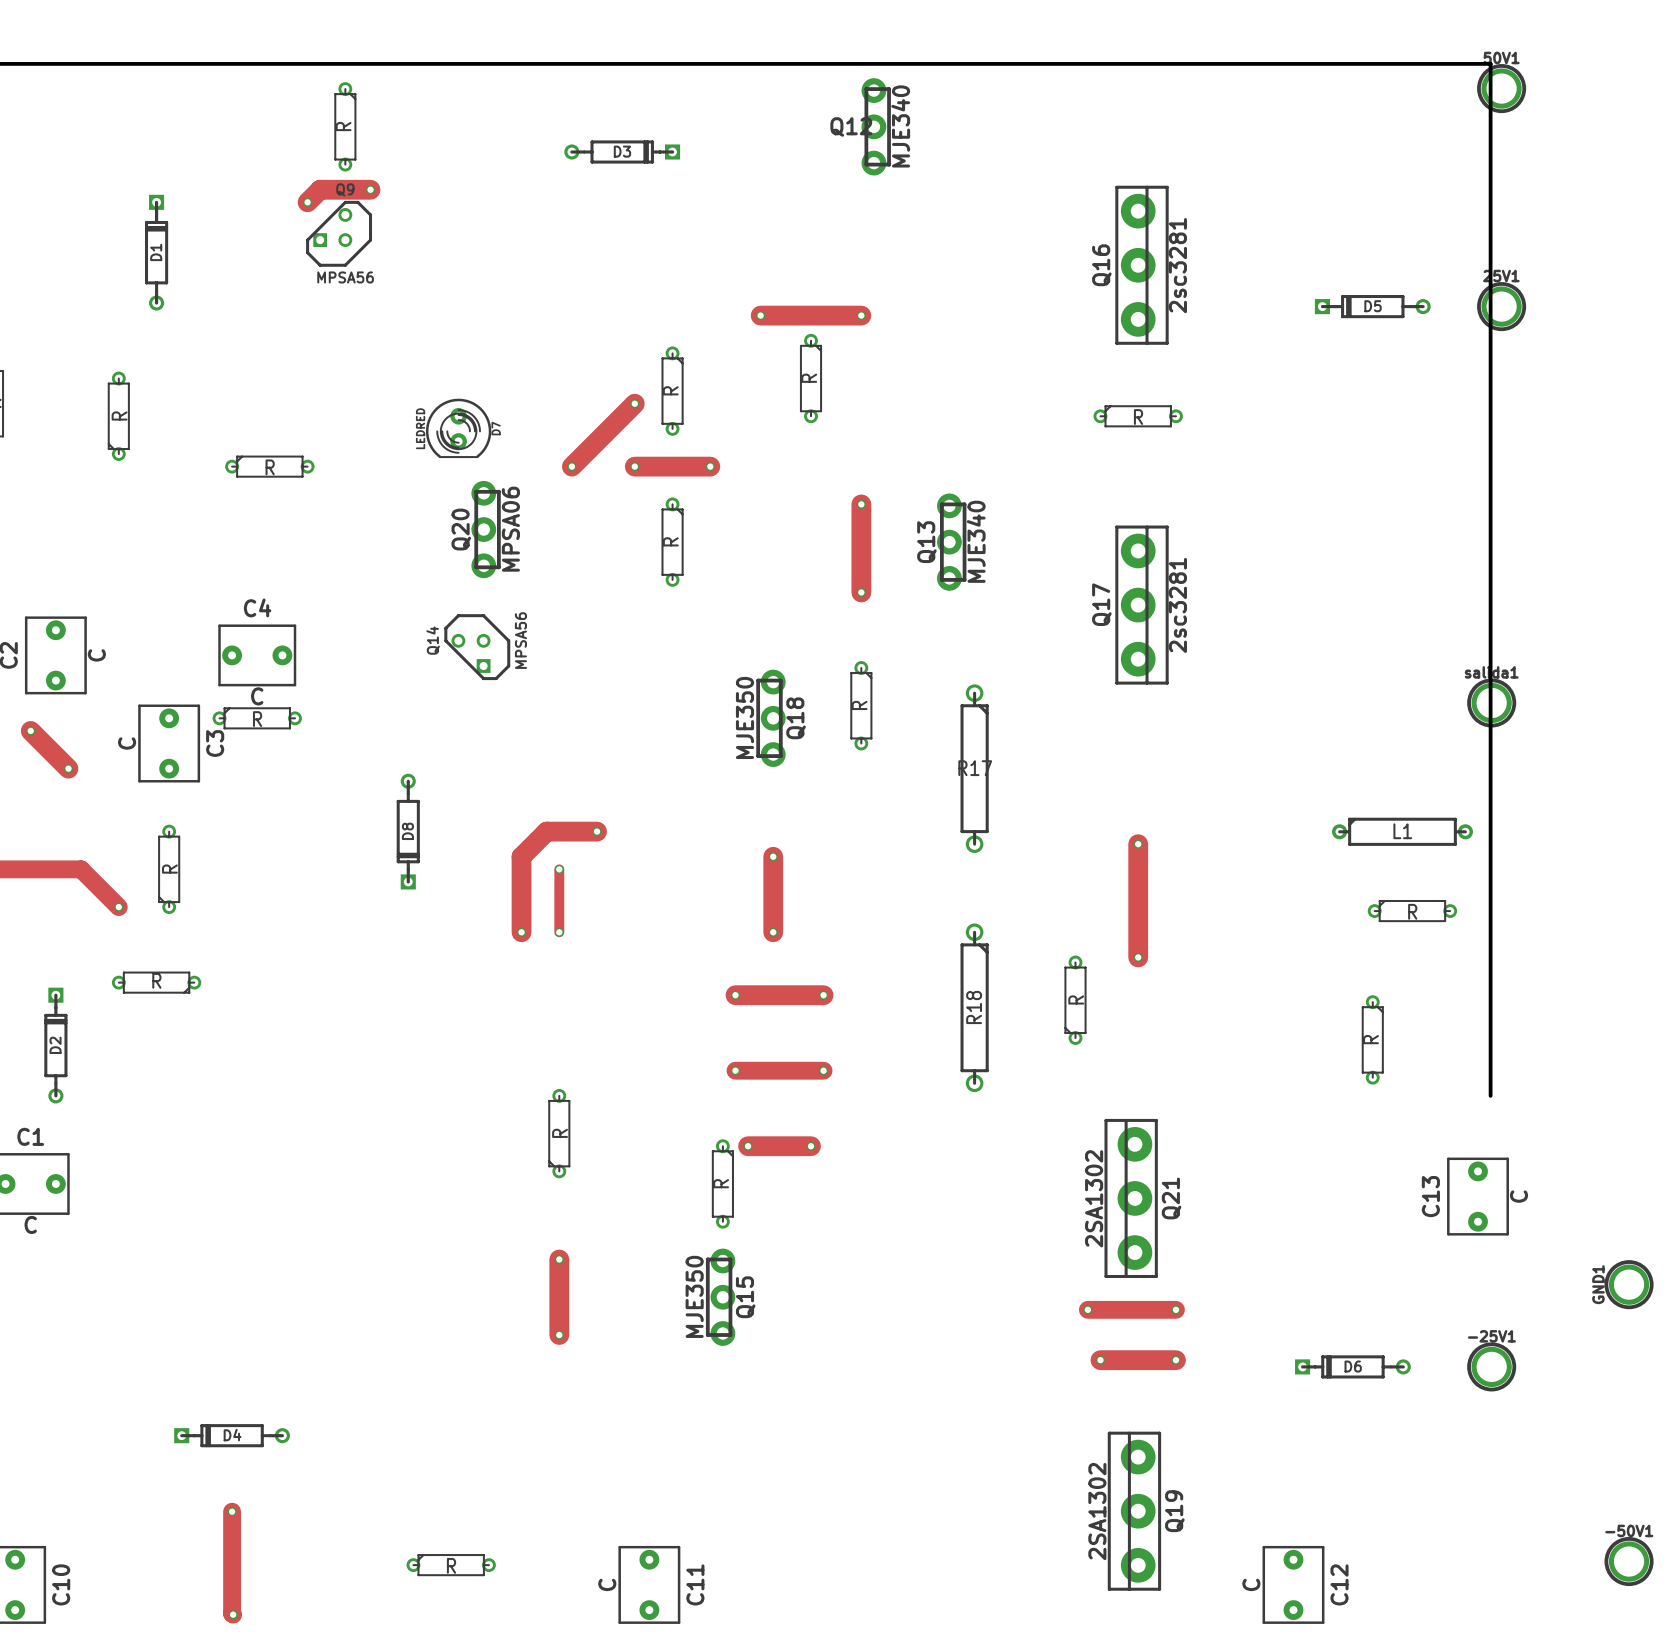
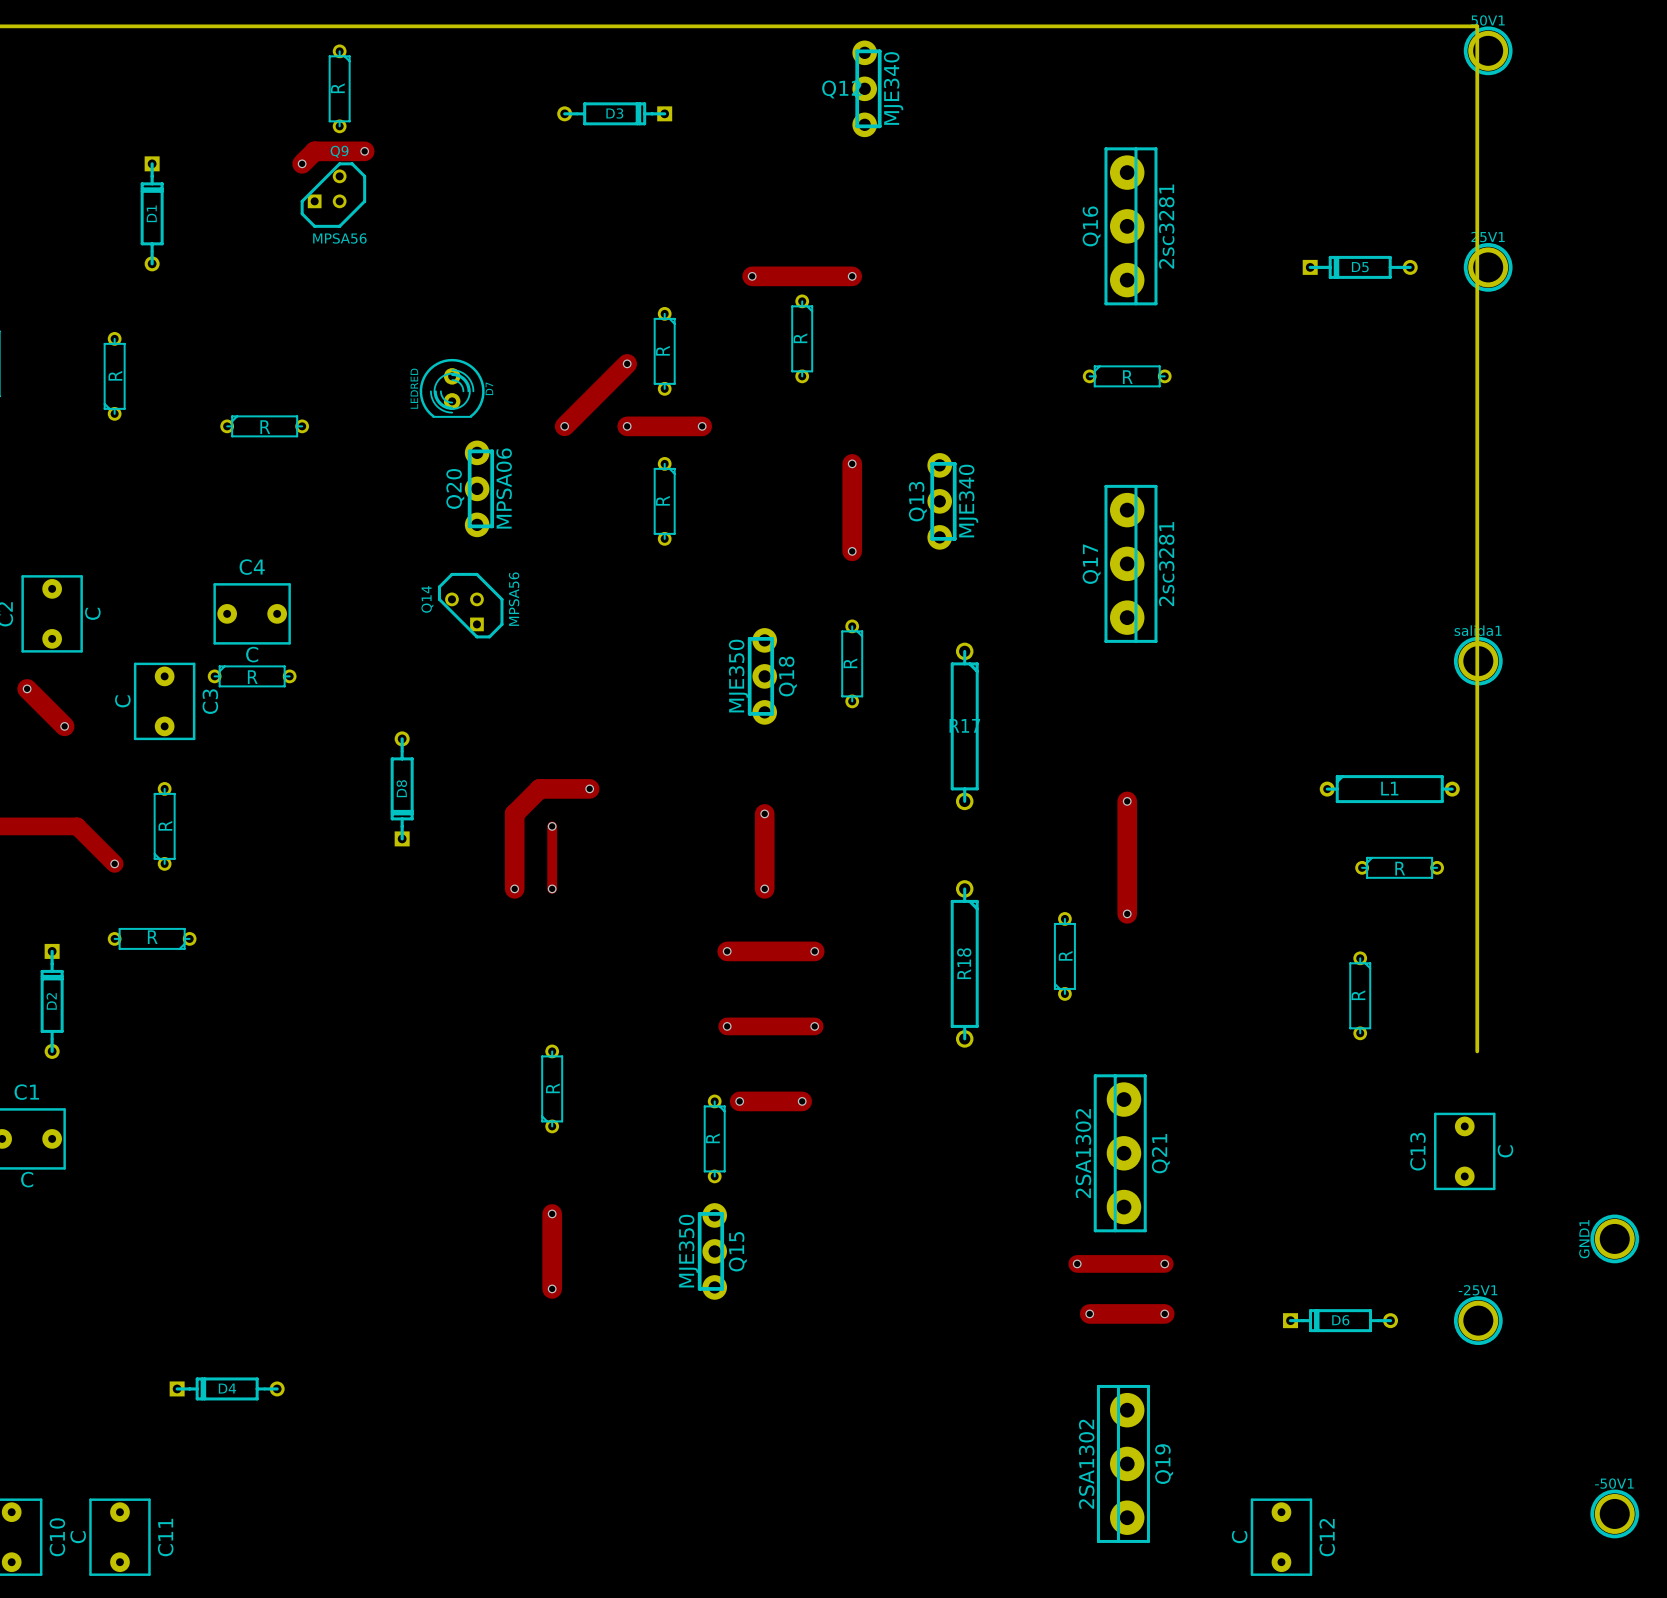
track: (232, 1511) (233, 1614) -> none
via: (232, 1511) -> none
part: R (451, 1565) -> none
C11 position: (649, 1584) -> (119, 1537)
via: (233, 1614) -> none

